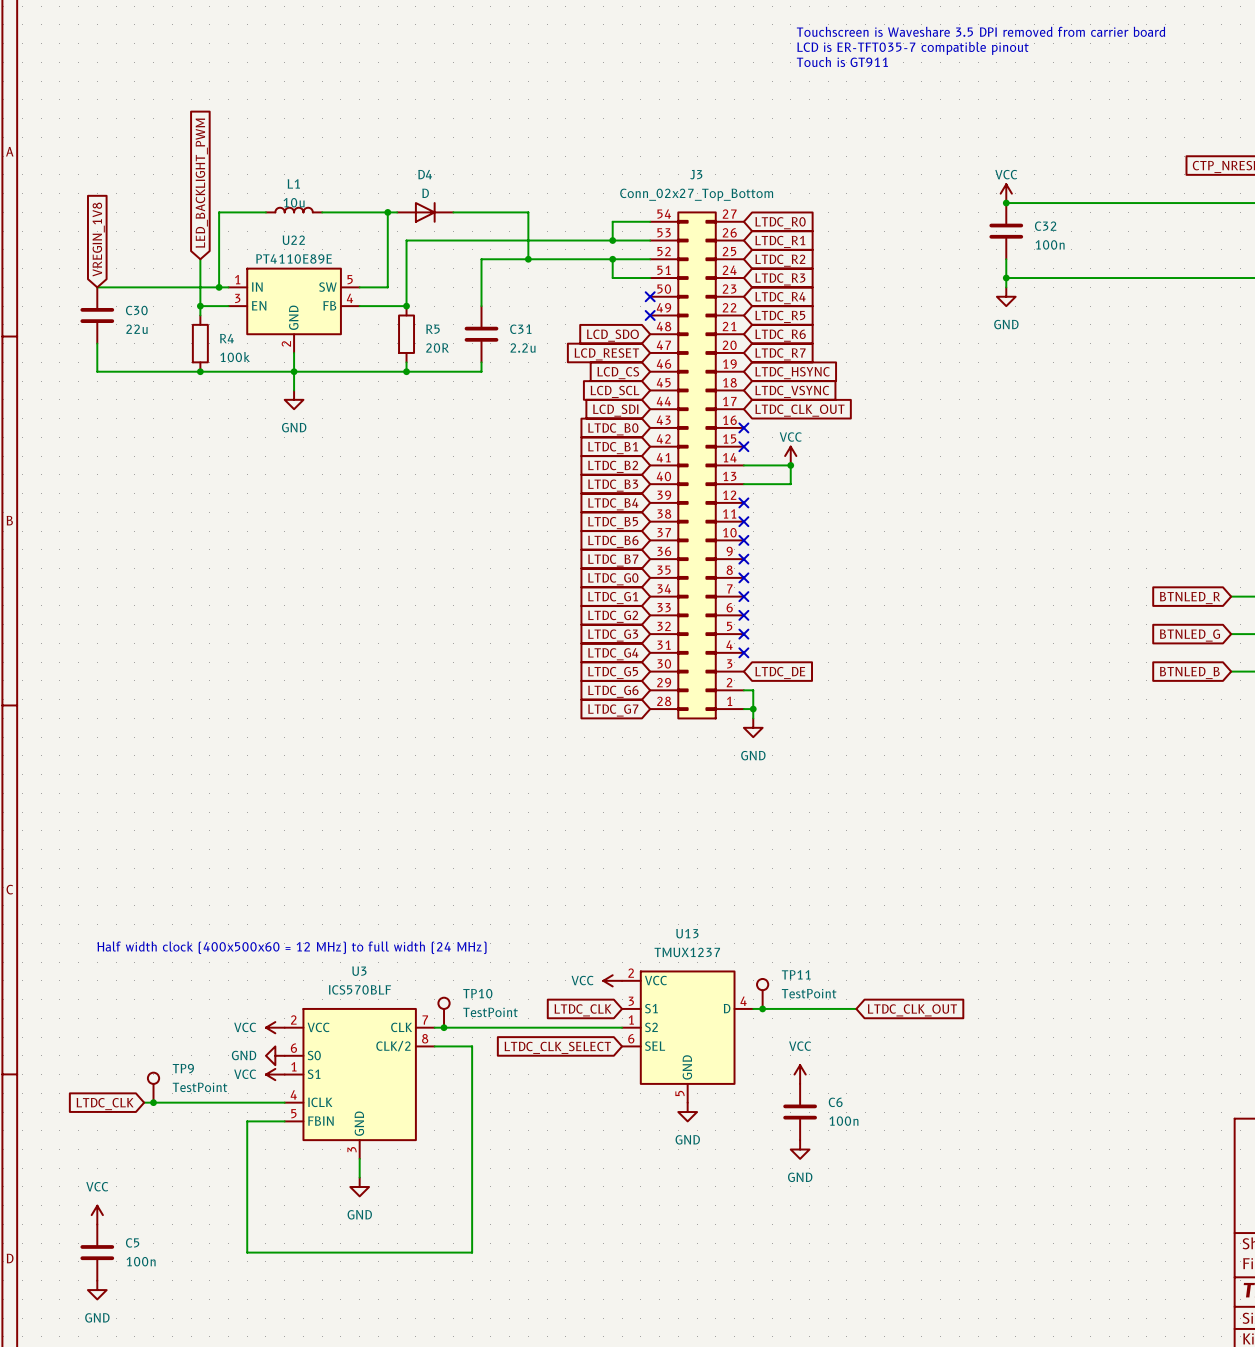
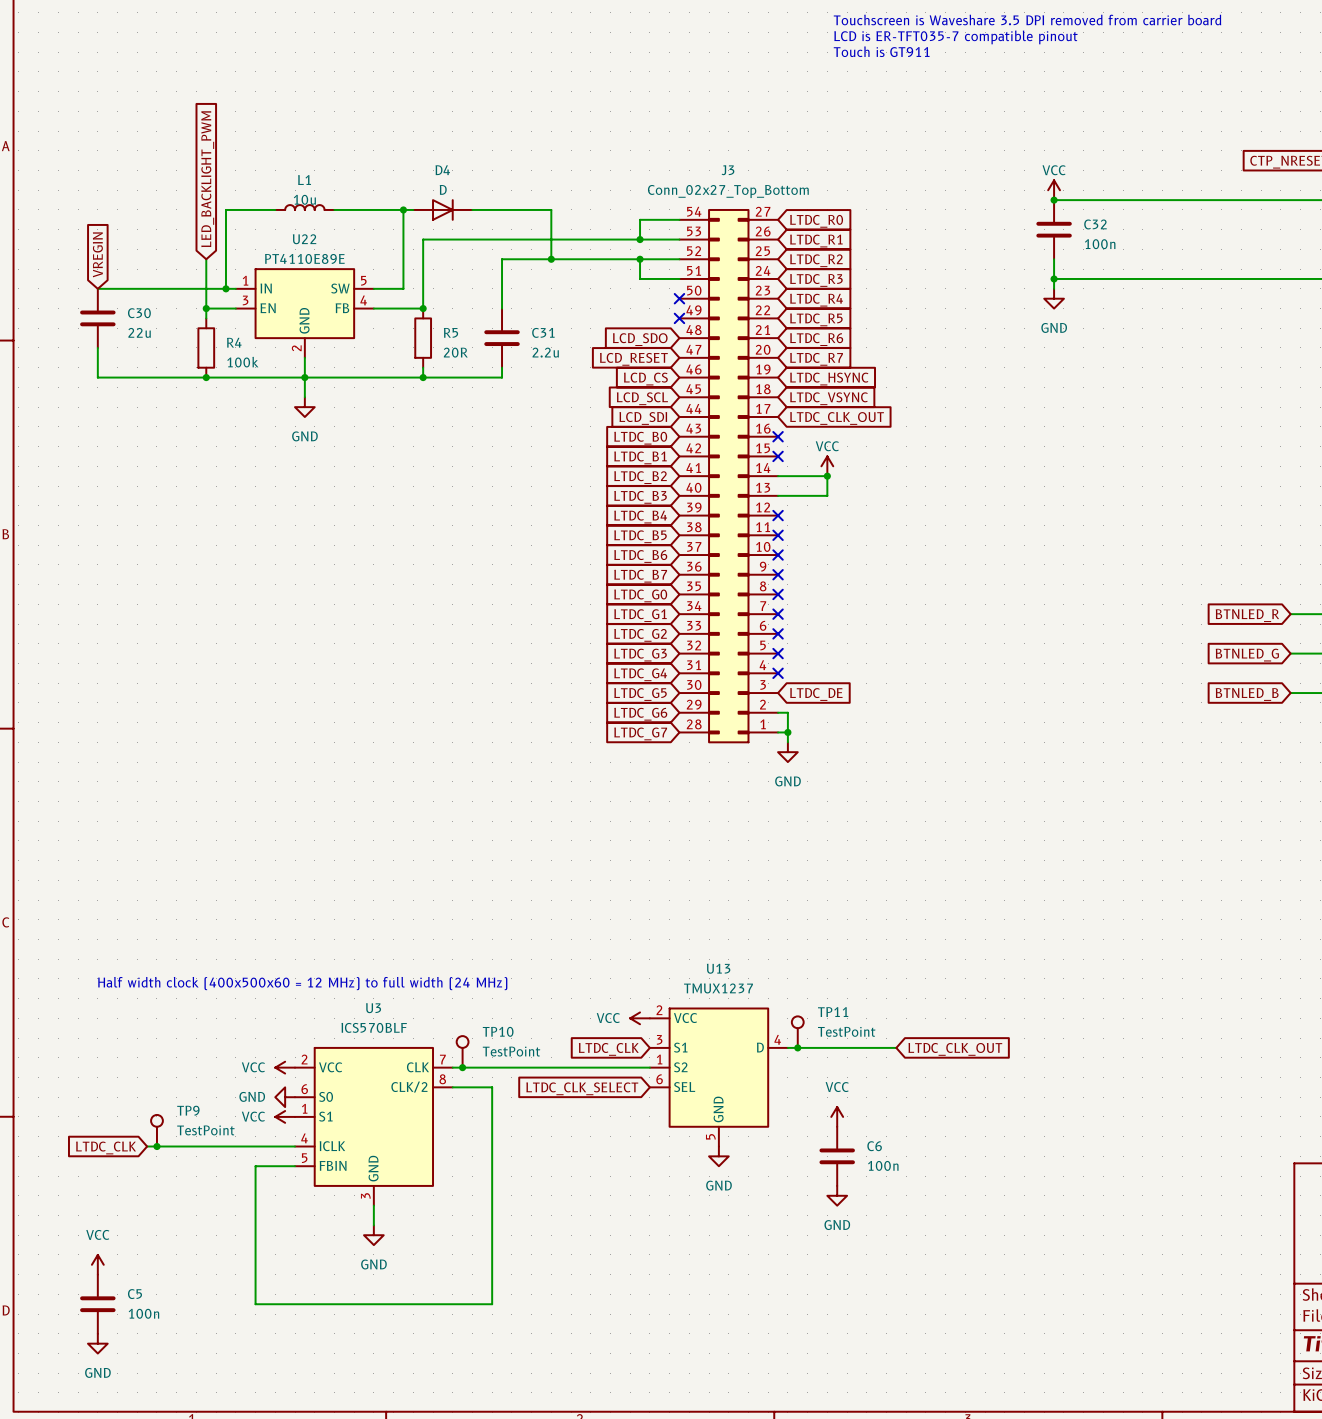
global label: VREGIN_1V8 (98, 239) -> VREGIN (97, 254)

